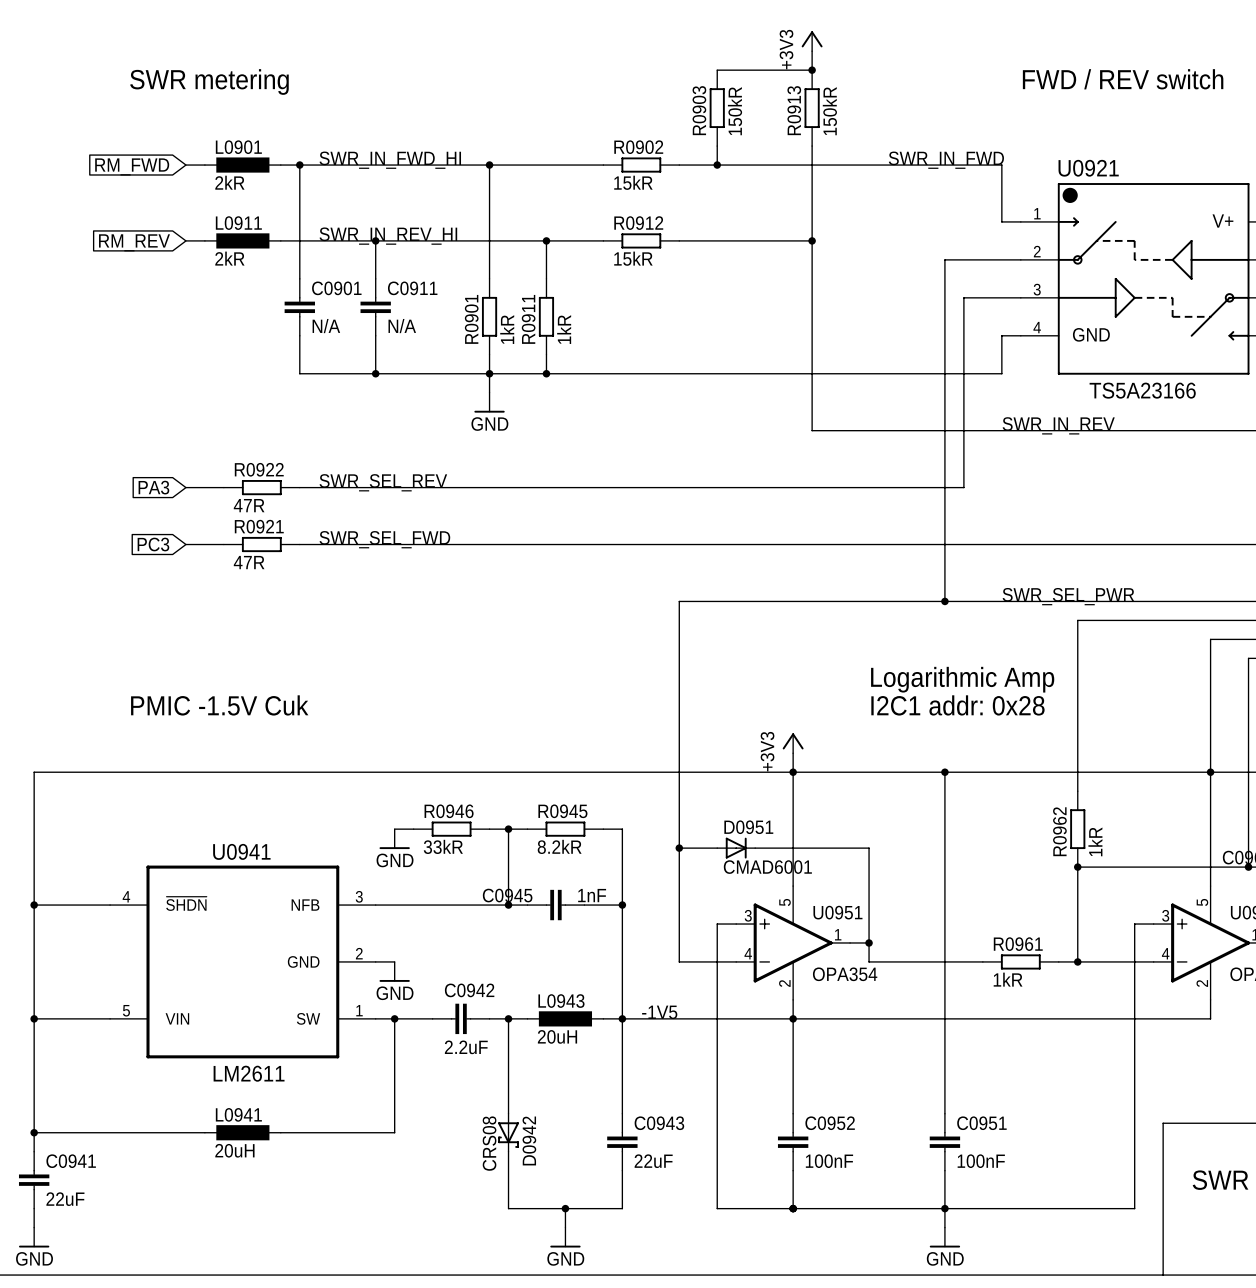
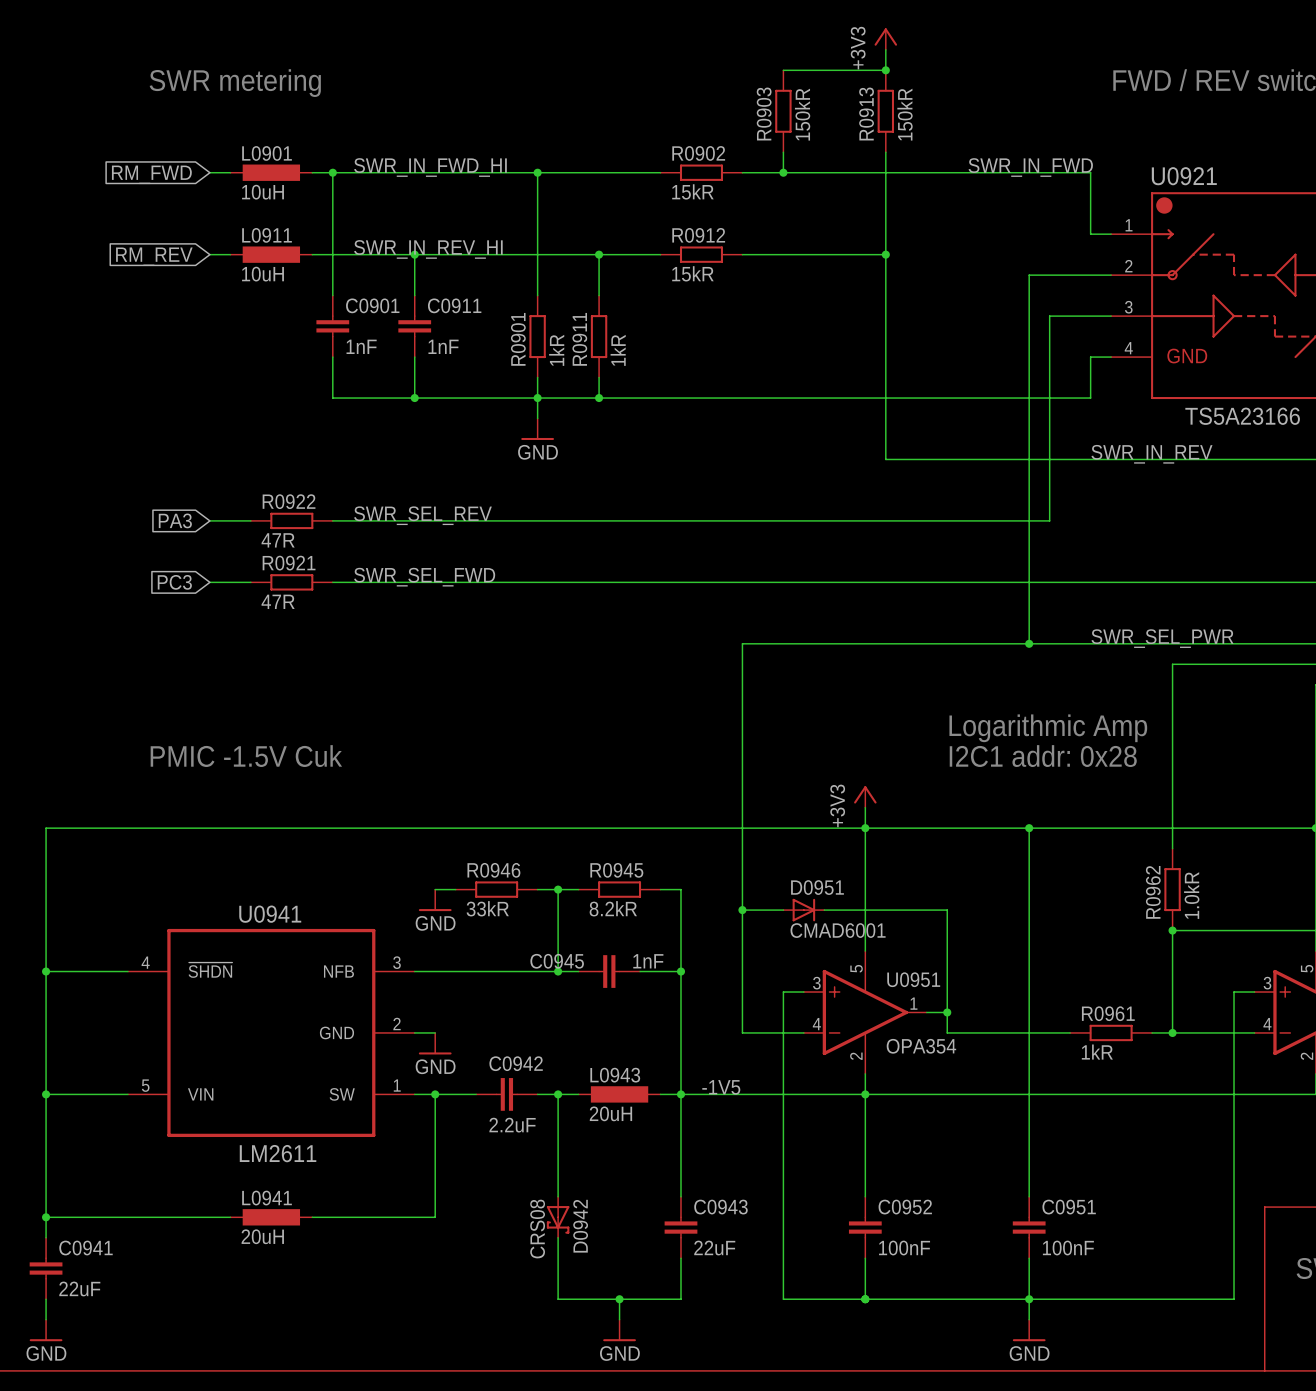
L0901 value: 2kR (229, 182) -> 10uH (263, 192)
L0911 value: 2kR (229, 258) -> 10uH (263, 274)
C0901 value: N/A (326, 326) -> 1nF (361, 346)
C0911 value: N/A (402, 326) -> 1nF (443, 346)
R0962 value: 1kR (1095, 841) -> 1.0kR (1191, 895)

